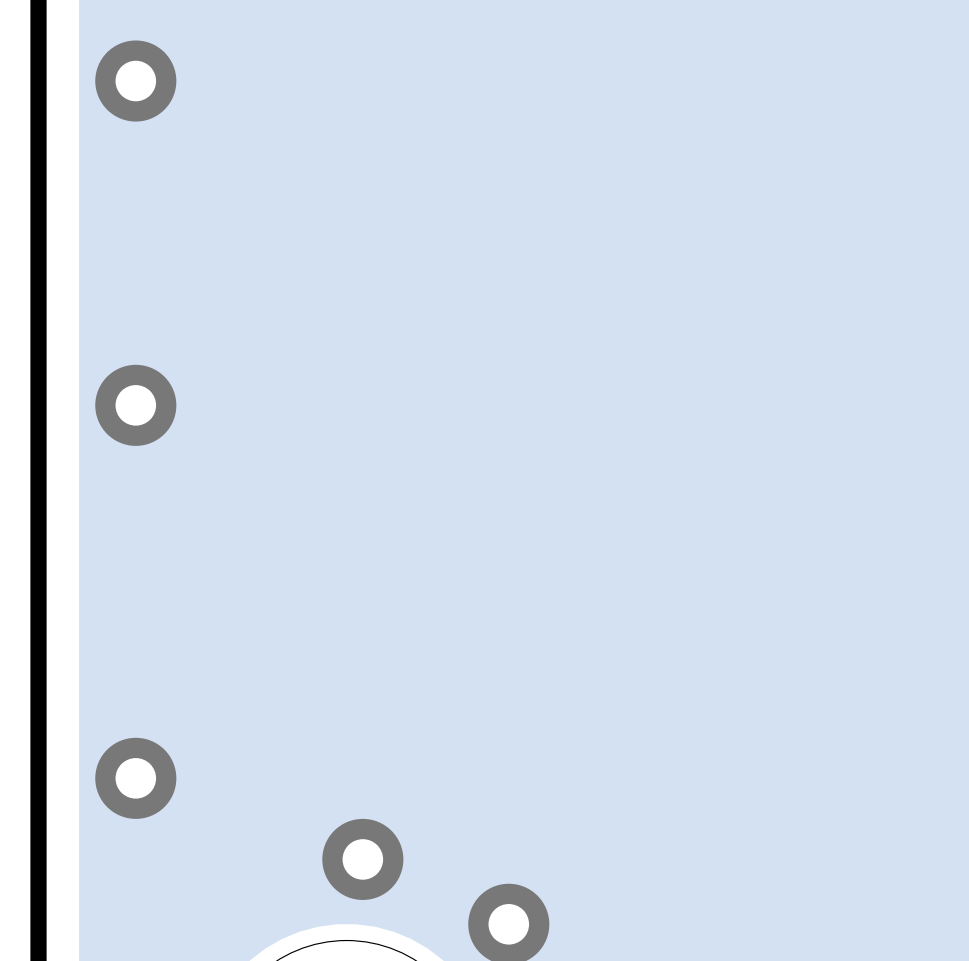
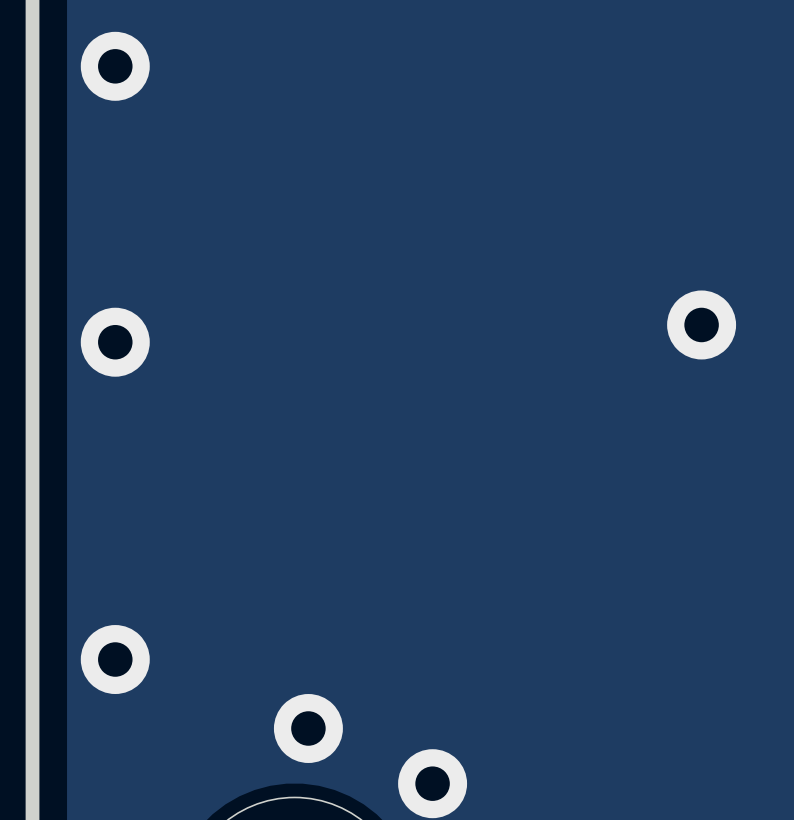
via: none -> (701, 324)

